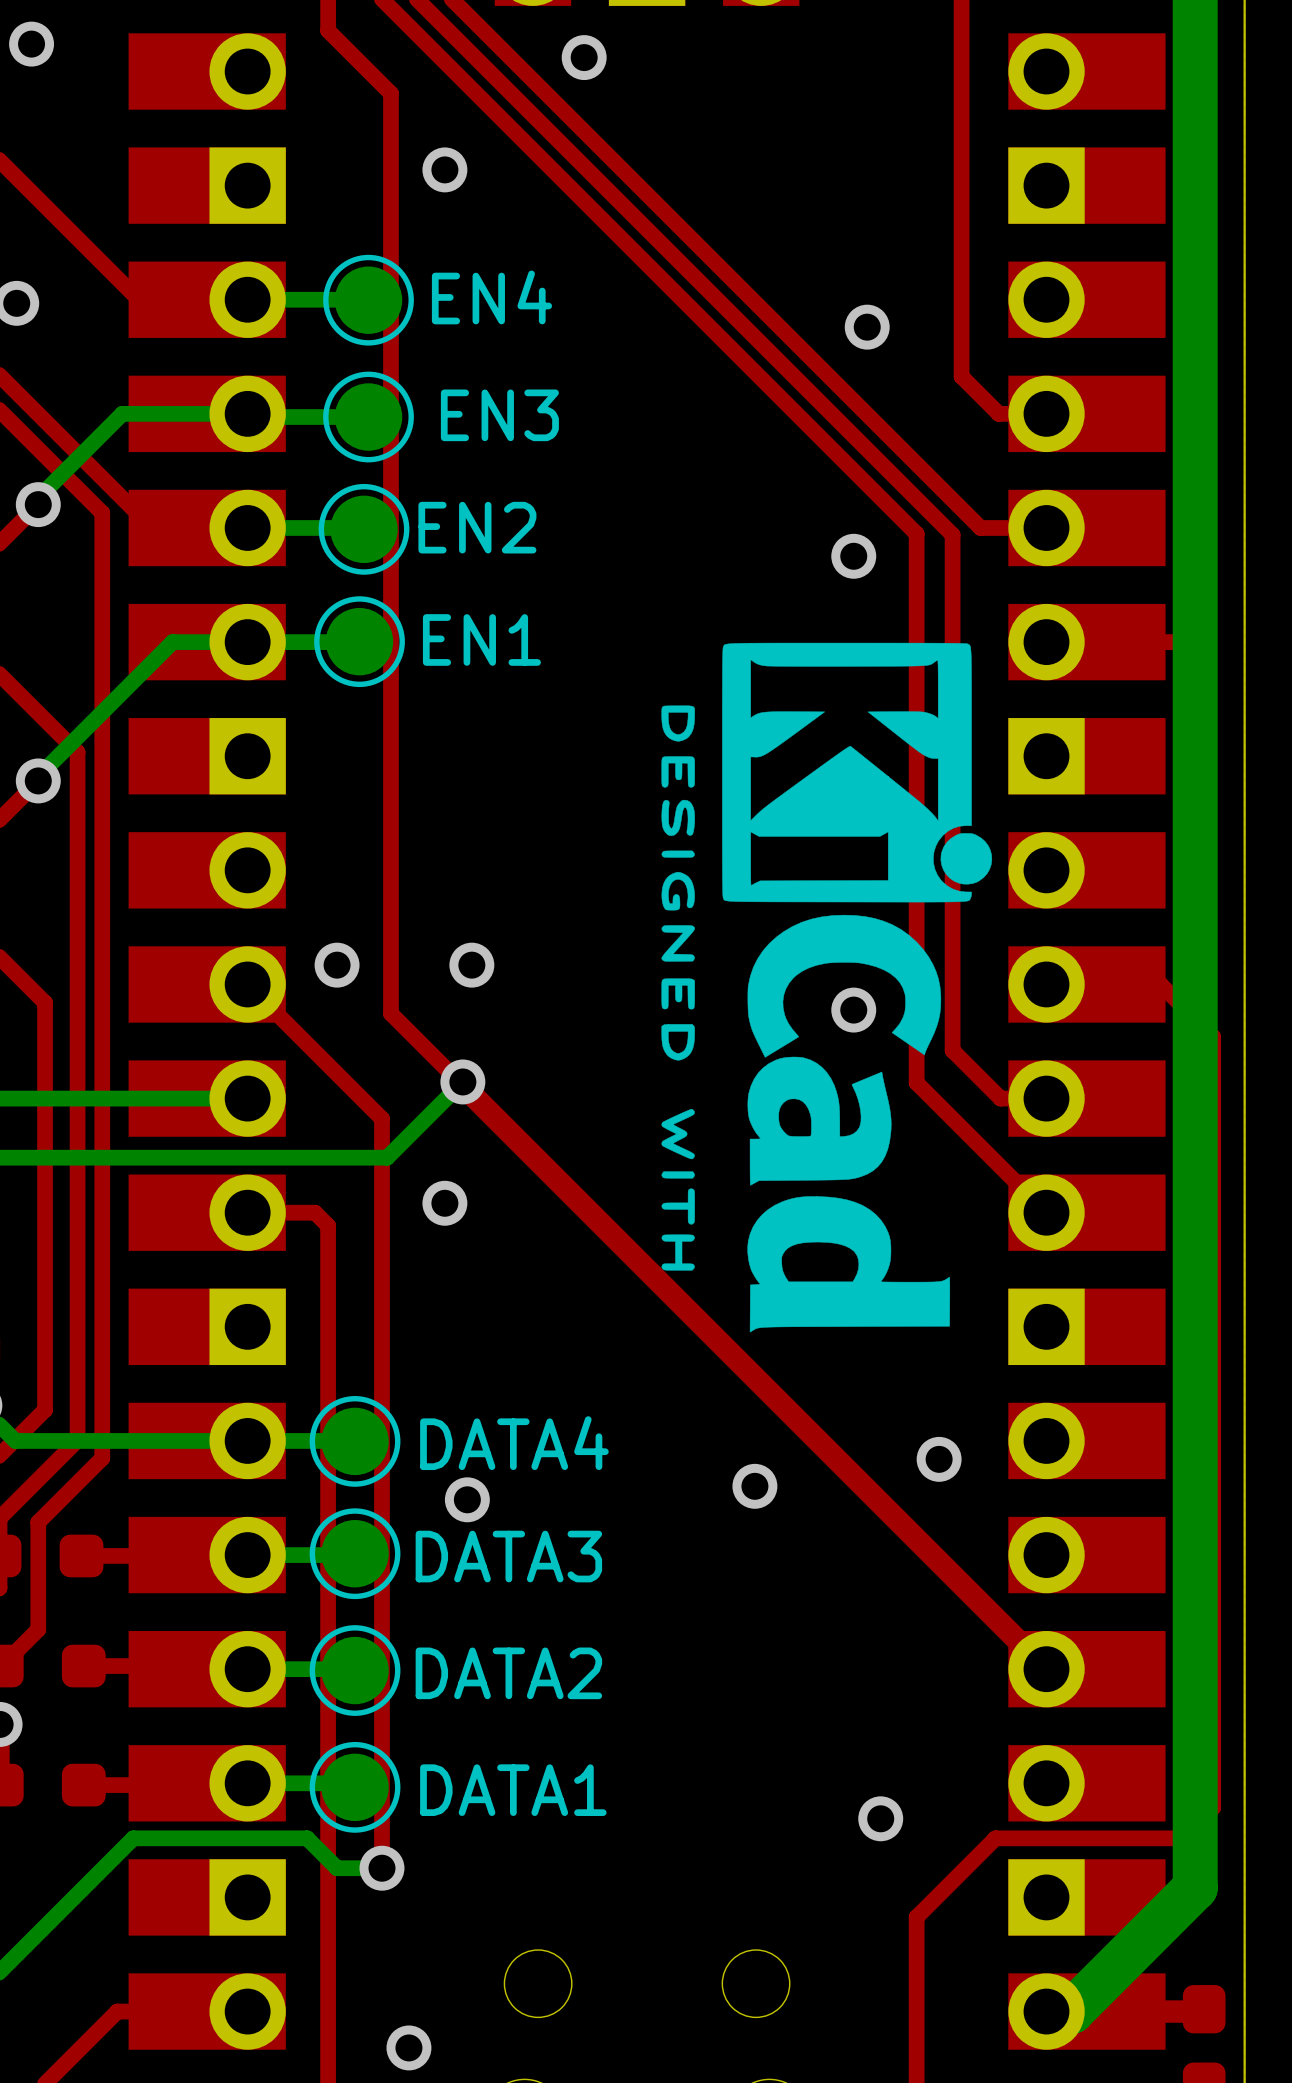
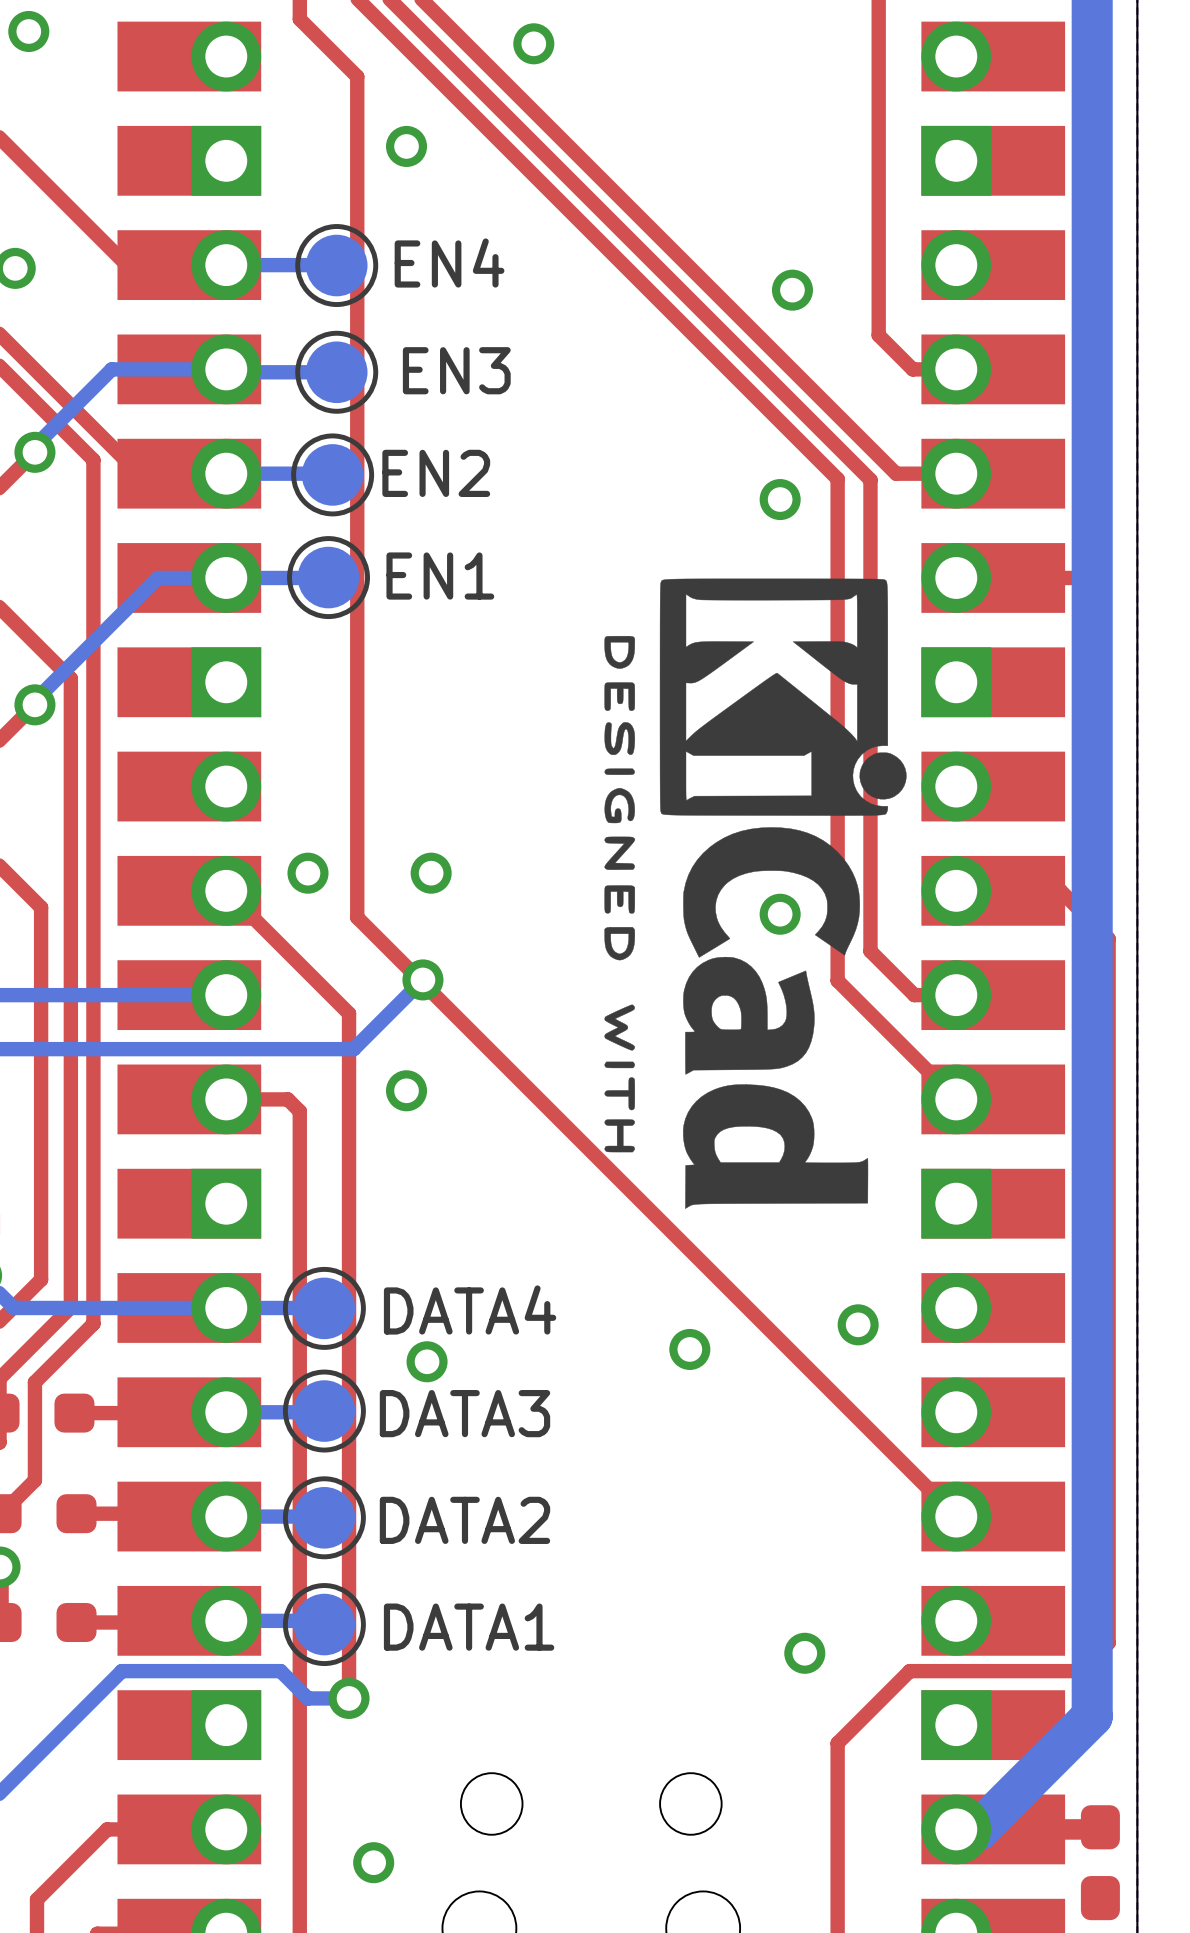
top track width: thick (460, 1083) (1046, 1669) -> thin (420, 981) (956, 1516)

